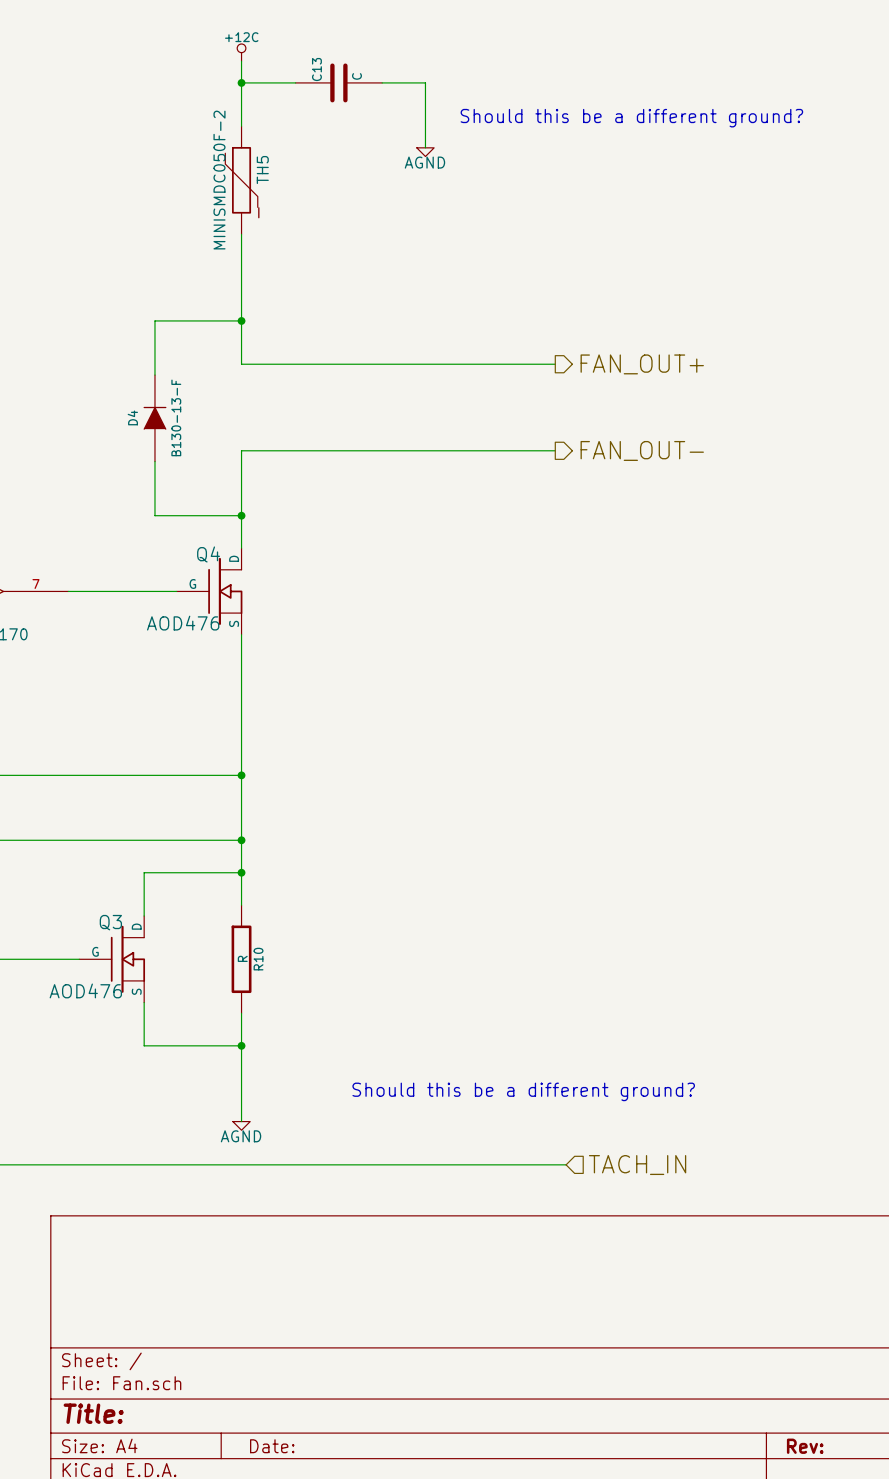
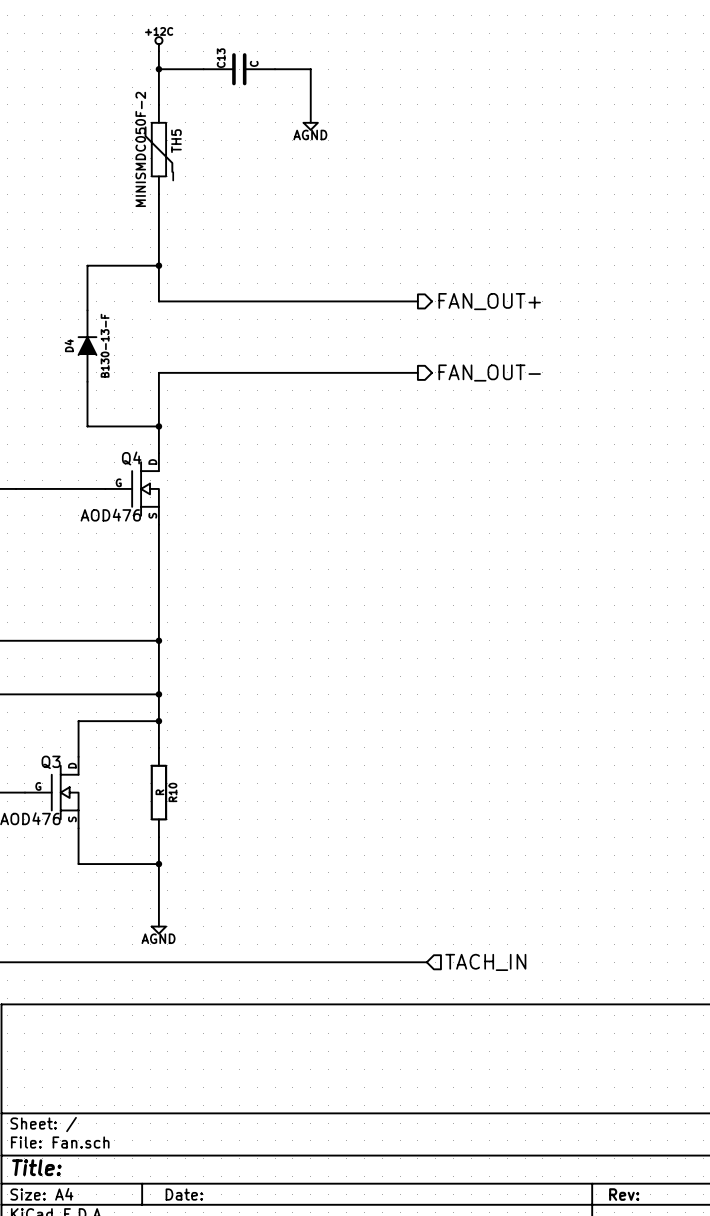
text: Should this be a different ground? (631, 118) -> none
text: Should this be a different ground? (523, 1091) -> none

